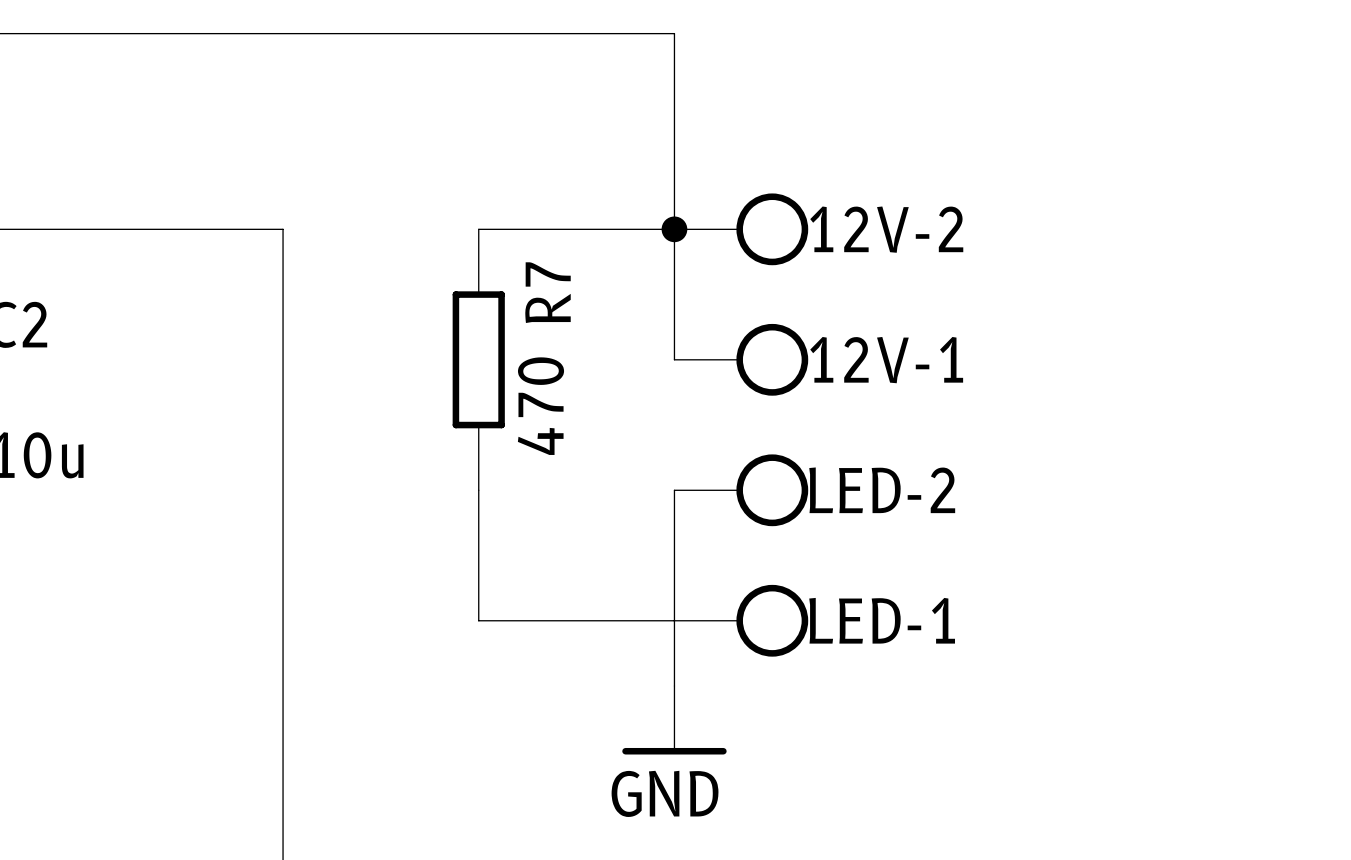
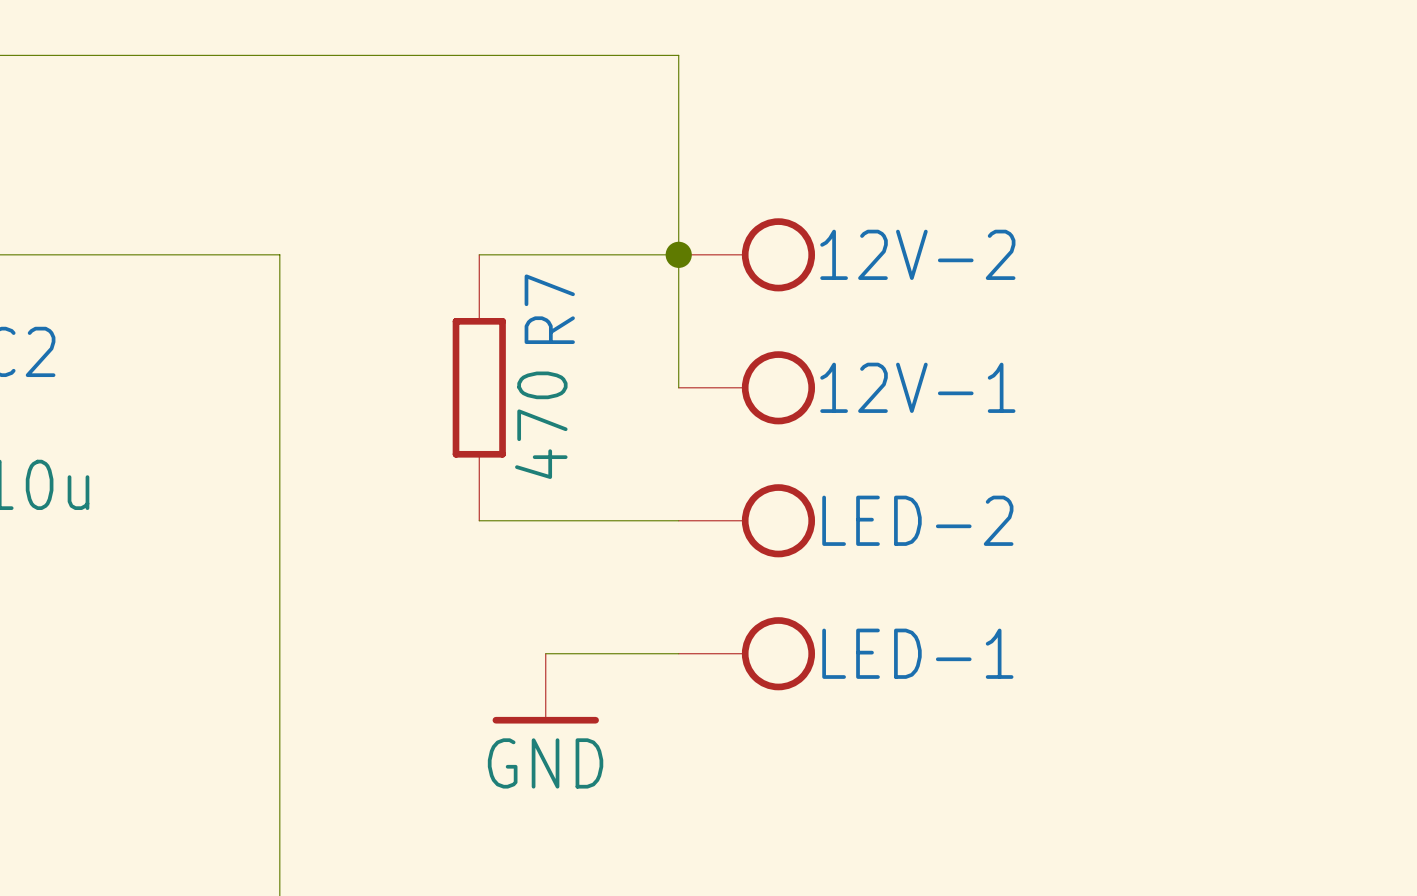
wire: (478, 490) (478, 620) (543, 620) -> (479, 520) (678, 520)
wire: (674, 490) (674, 686) -> none
power symbol position: GND (674, 720) -> GND (545, 688)

